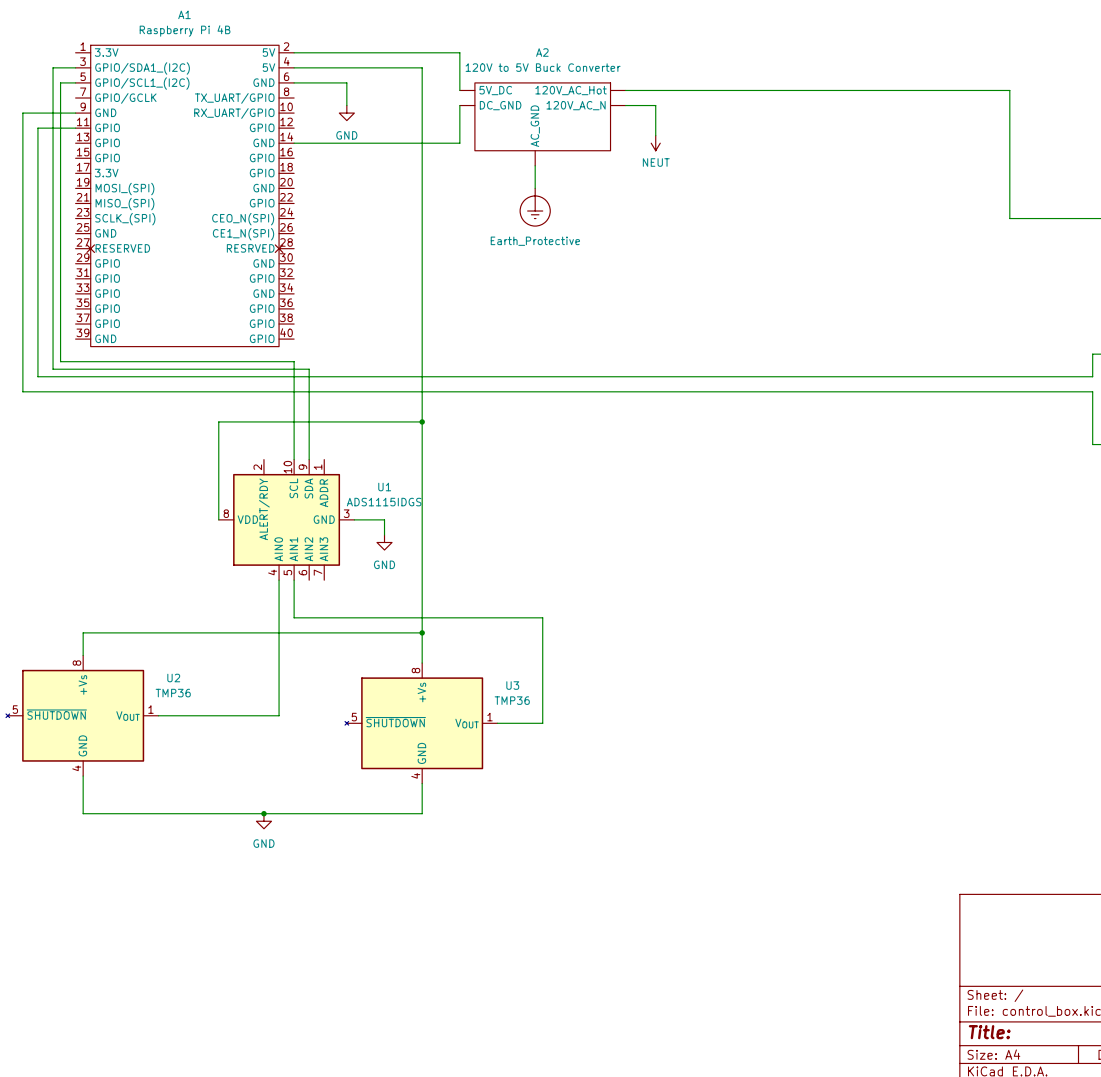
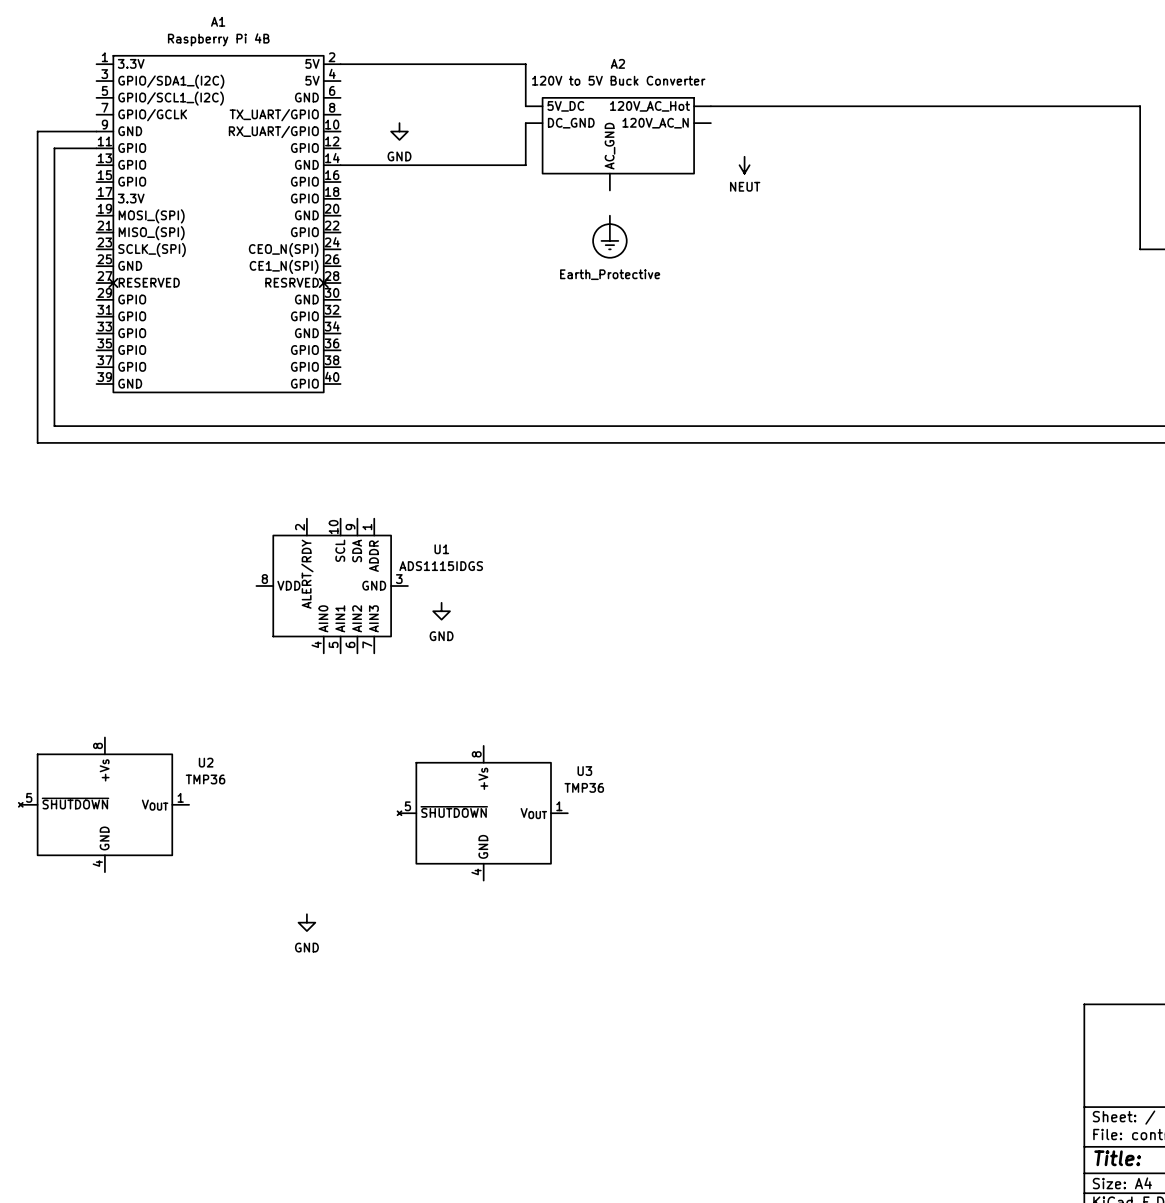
wire: (75, 67) (53, 67) (53, 369) (309, 369) (309, 459) -> none
wire: (294, 67) (422, 67) (422, 663) -> none
wire: (75, 82) (60, 82) (60, 361) (294, 361) (294, 459) -> none
wire: (294, 82) (346, 82) (346, 105) -> none
wire: (625, 105) (655, 105) (655, 135) -> none
wire: (535, 165) (535, 188) -> none
wire: (422, 421) (218, 421) (218, 519) -> none
junction: (422, 421) -> none
wire: (354, 519) (384, 519) (384, 534) -> none
wire: (279, 580) (279, 715) (158, 715) -> none
wire: (294, 580) (294, 617) (542, 617) (542, 723) (497, 723) -> none
wire: (422, 632) (83, 632) (83, 655) -> none
junction: (422, 632) -> none
wire: (83, 776) (83, 813) (422, 813) (422, 783) -> none
junction: (263, 813) -> none

